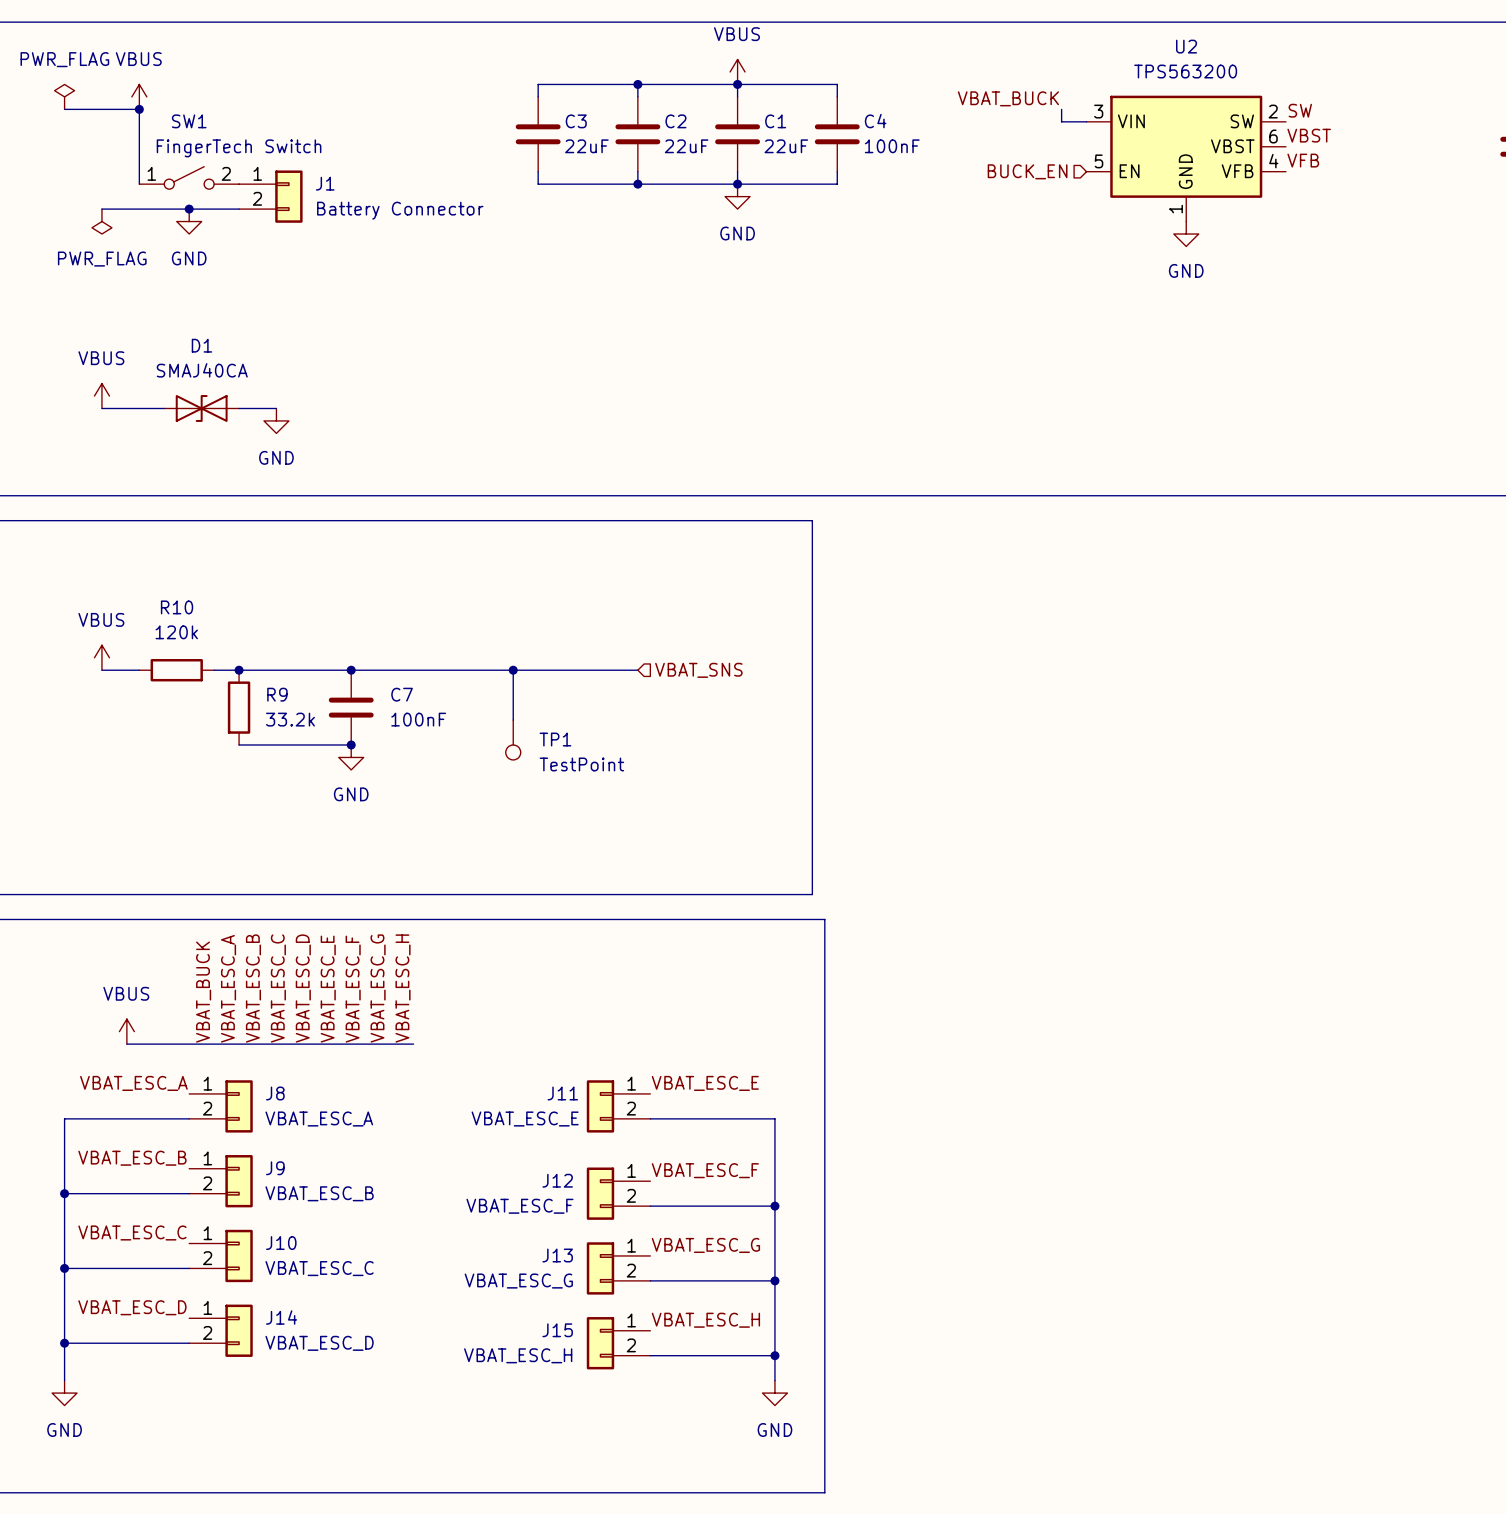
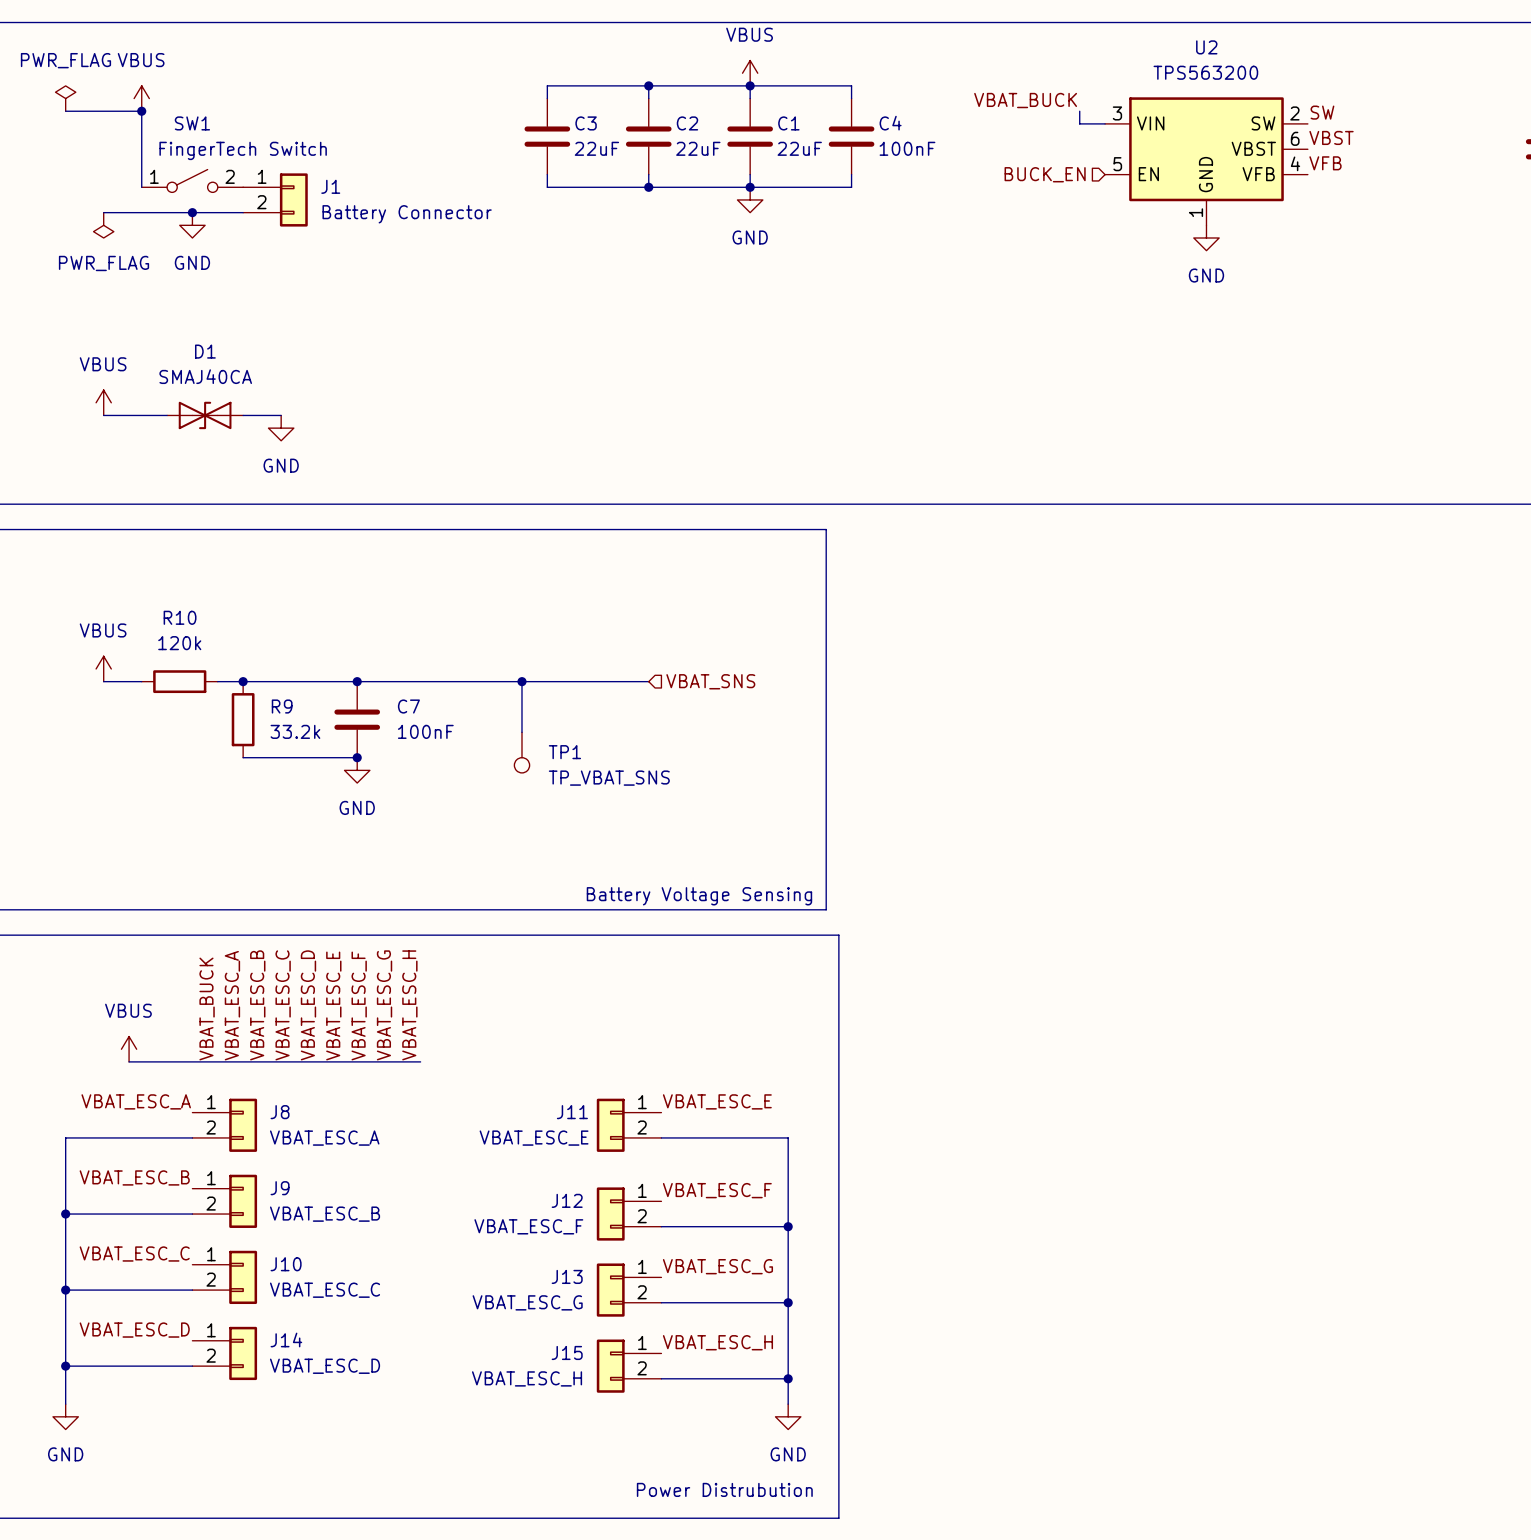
TP1 value: TestPoint (581, 764) -> TP_VBAT_SNS (609, 778)
text: none -> Battery Voltage Sensing (699, 896)
text: none -> Power Distrubution (724, 1489)

